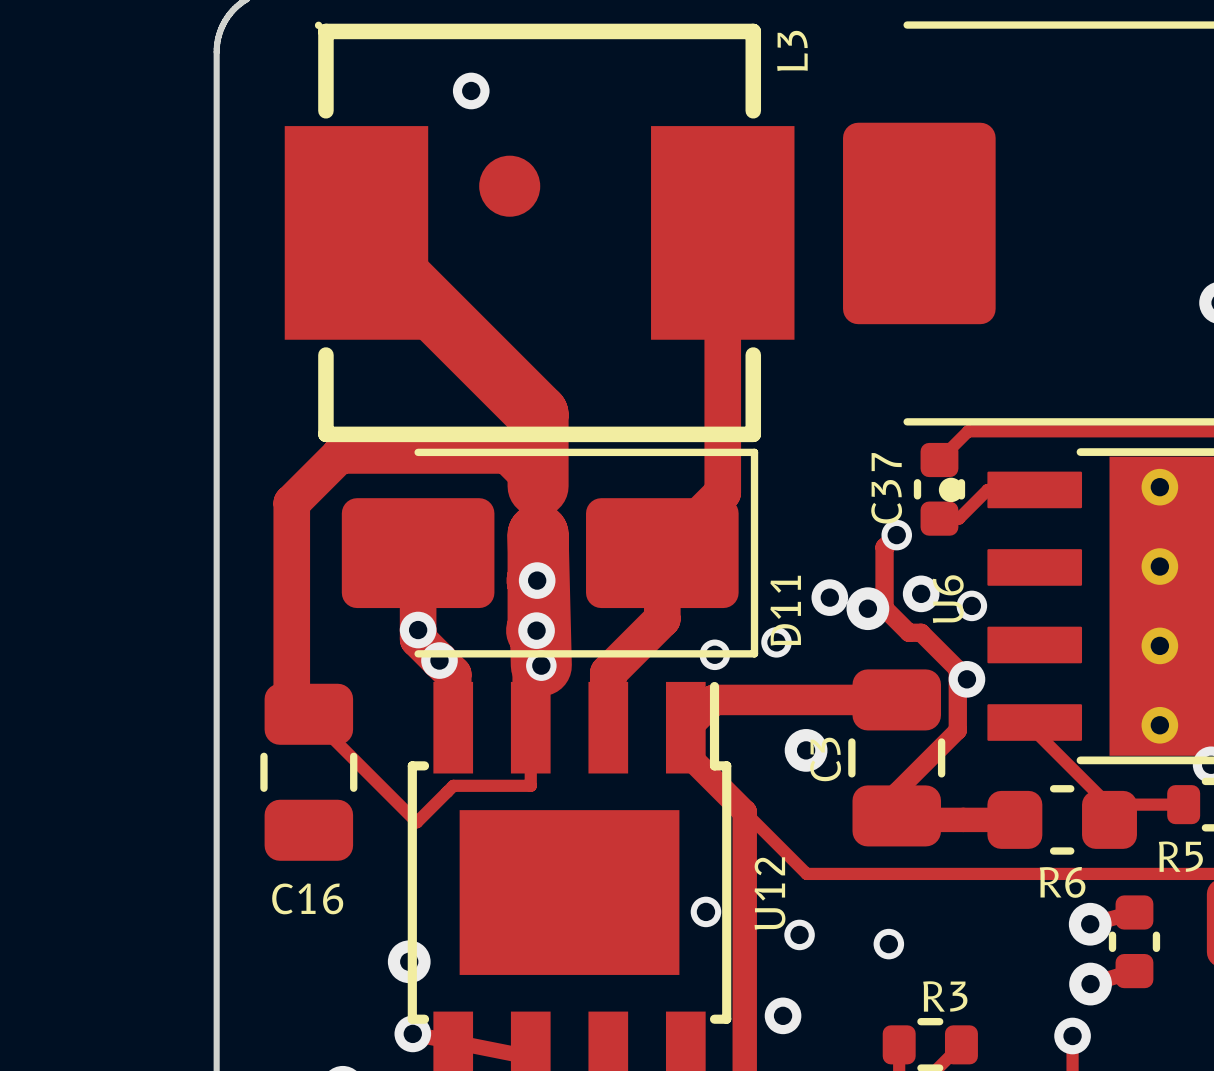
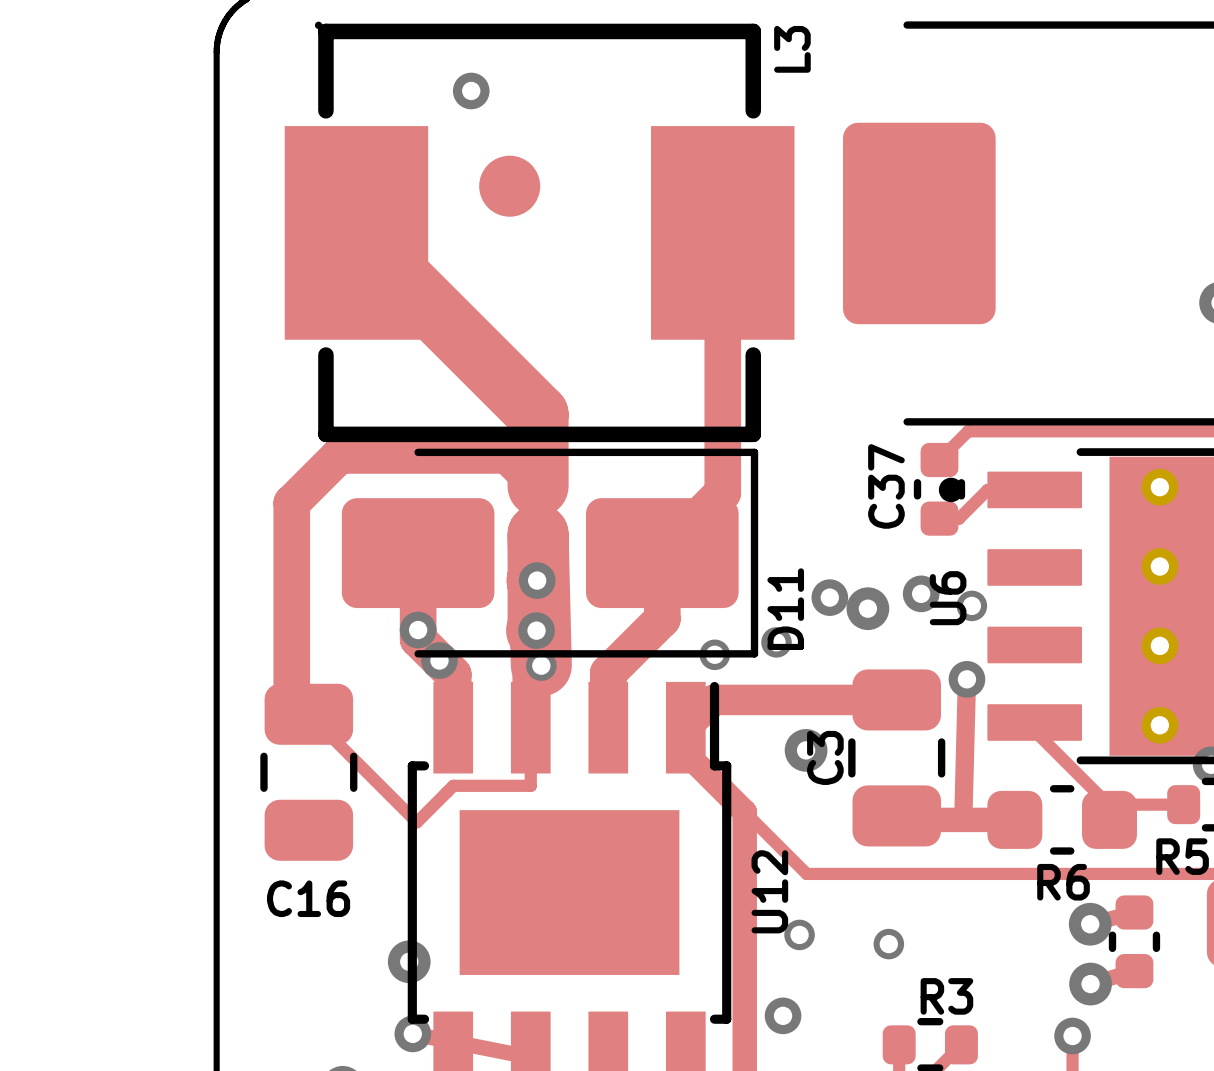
track: (896, 535) (884, 547) (884, 608) (908, 632) (921, 632) (957, 669) (957, 730) (896, 791) (896, 815) -> none
via: (896, 535) -> none
track: none -> (966, 679) (963, 819)
via: (705, 911) -> none

